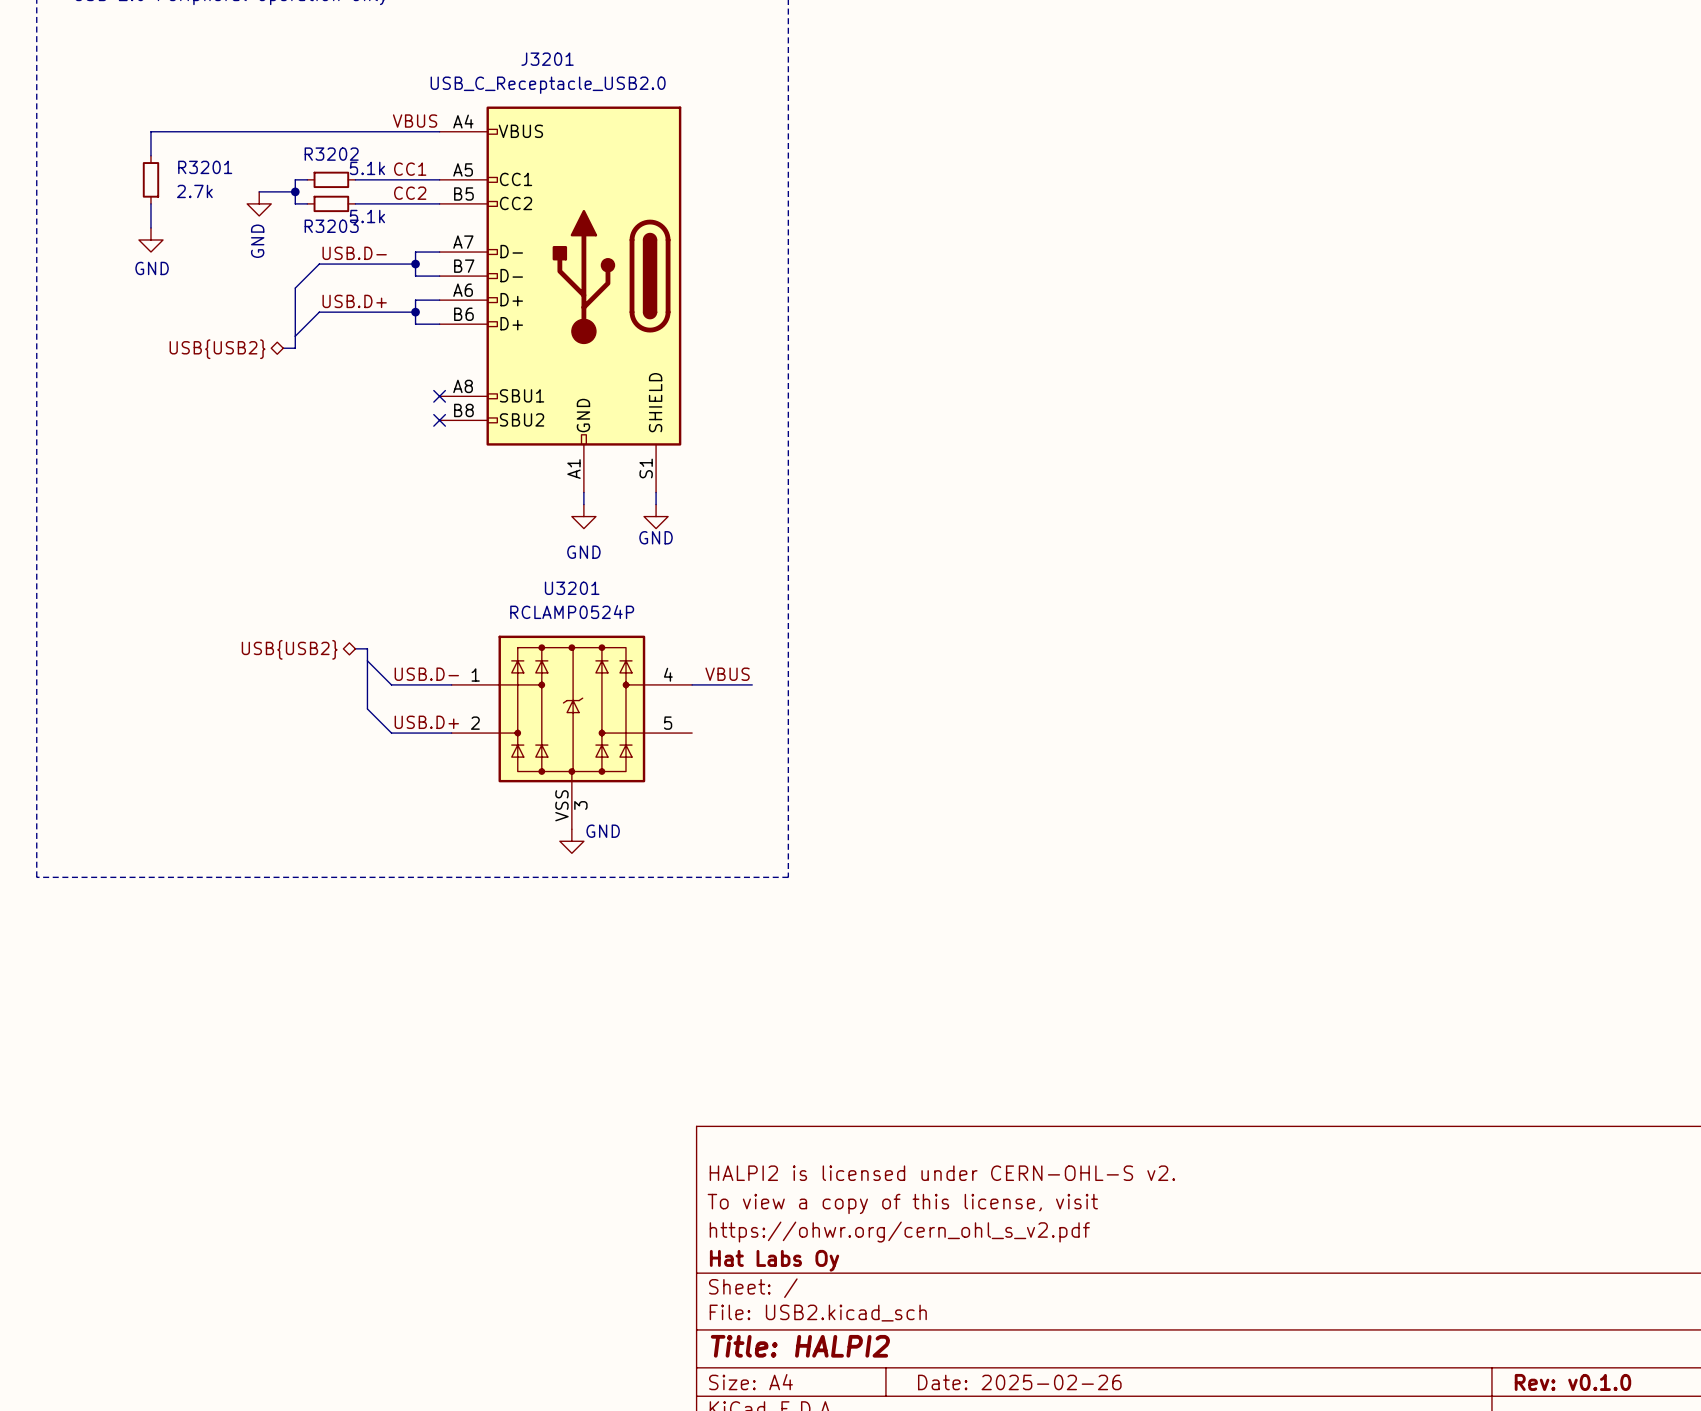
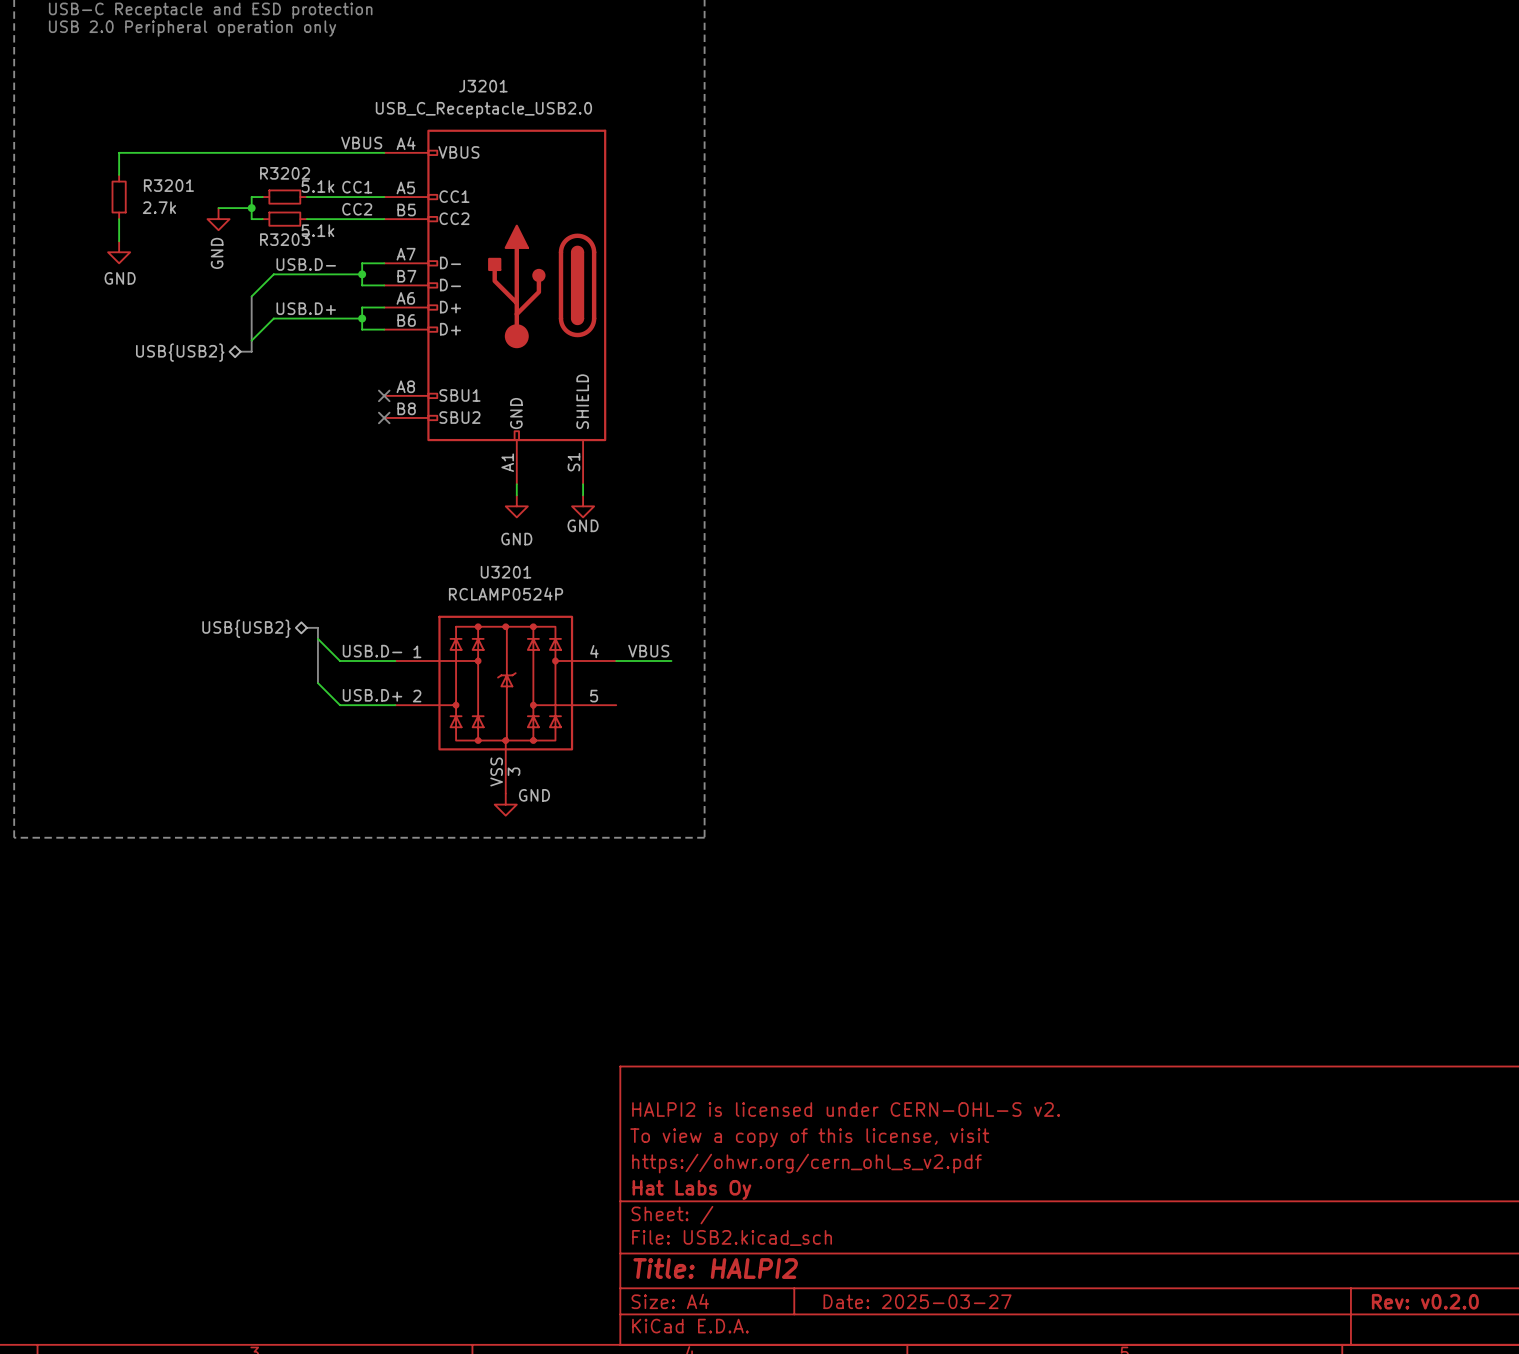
title block: Date: 2025-02-26 (1019, 1382) -> Date: 2025-03-27 (917, 1301)
title block: Rev: v0.1.0 (1572, 1382) -> Rev: v0.2.0 (1425, 1301)

